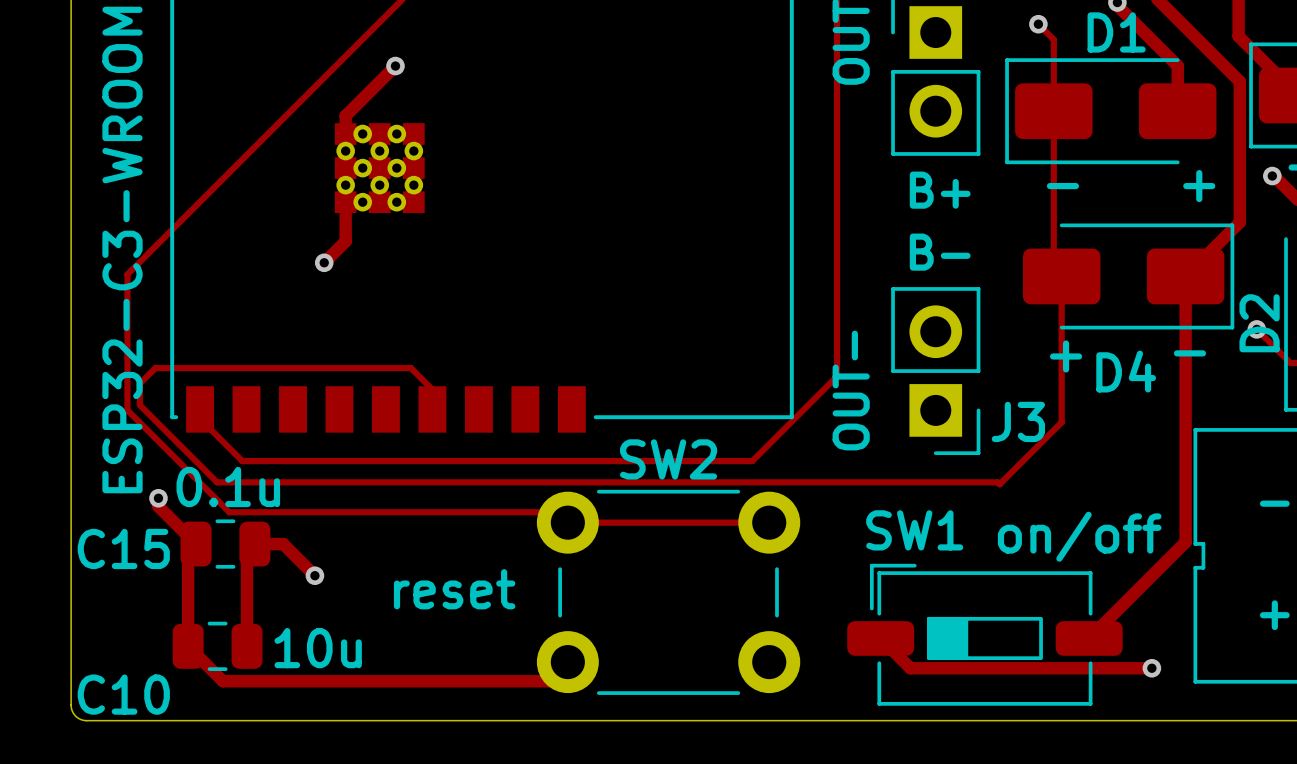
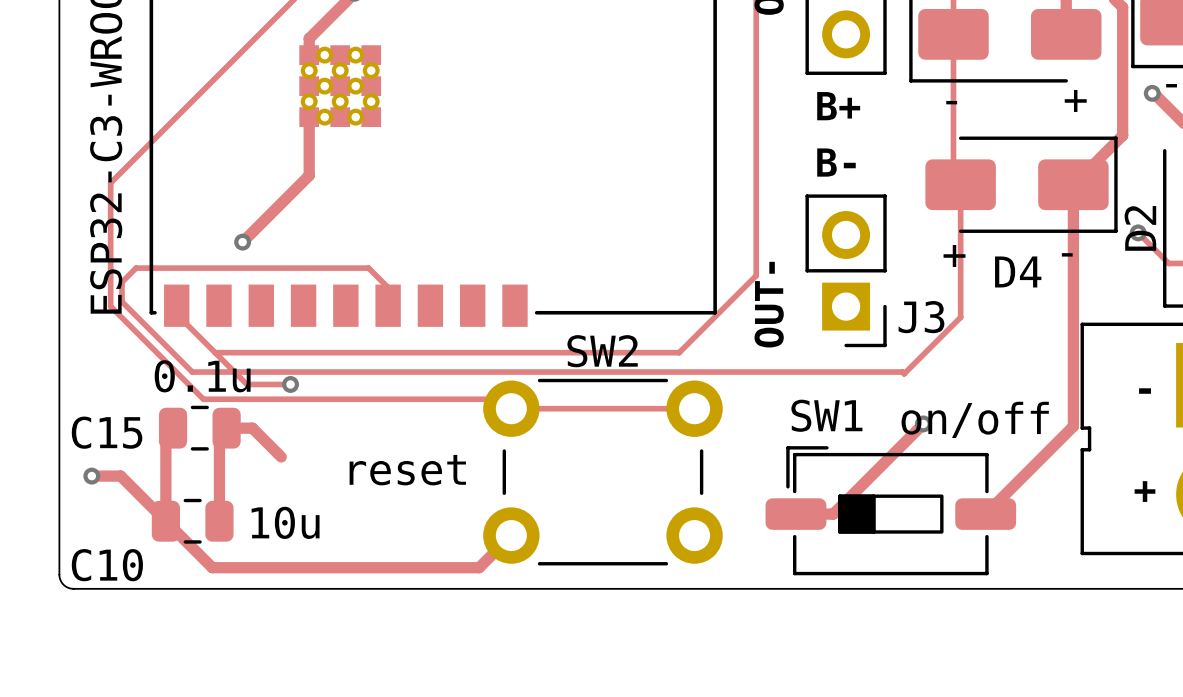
track: (345, 241) (324, 262) -> (309, 152) (309, 175) (242, 242)
via position: (324, 262) -> (242, 242)
track: none -> (215, 352) (246, 384) (290, 384)
track: (158, 498) (158, 506) (196, 544) -> none
via: (158, 498) -> none
via position: (314, 575) -> (290, 384)
track: none -> (91, 476) (120, 476) (165, 521)
via: none -> (91, 476)
track: (880, 638) (910, 668) (1151, 668) -> (795, 514) (833, 514) (923, 423)
via position: (1151, 668) -> (923, 423)
track: (223, 681) (548, 681) -> (197, 552) (212, 567) (479, 567) (493, 552)

